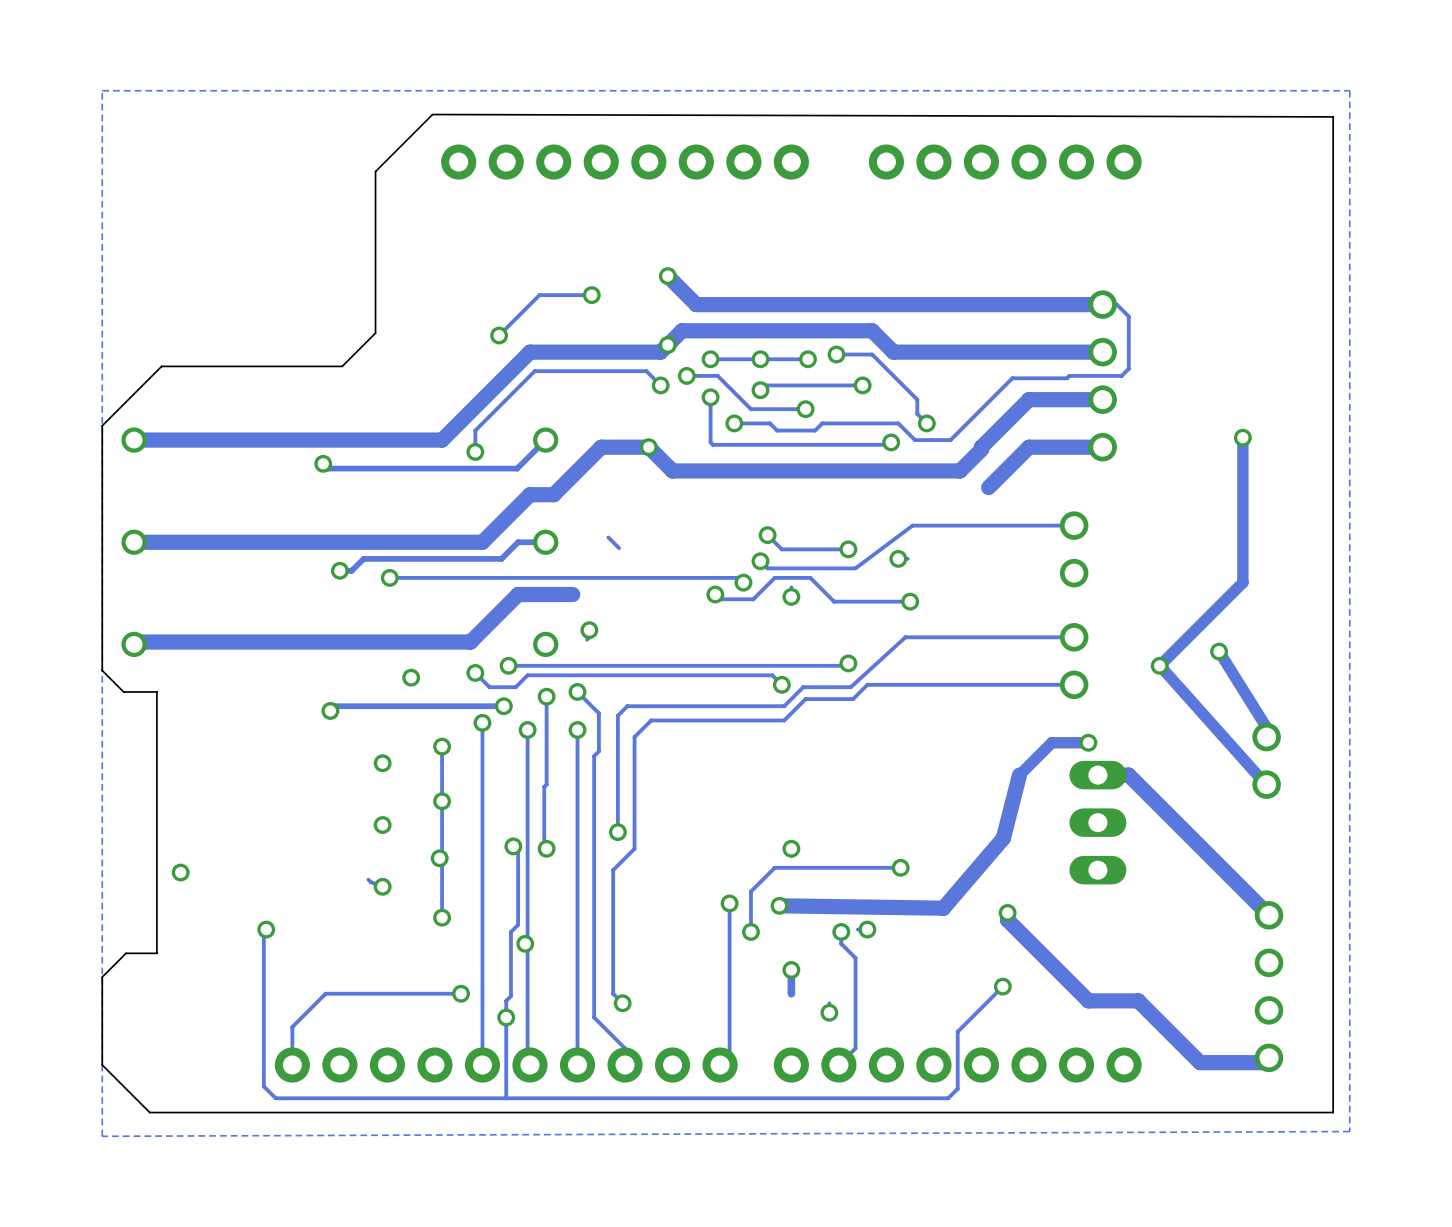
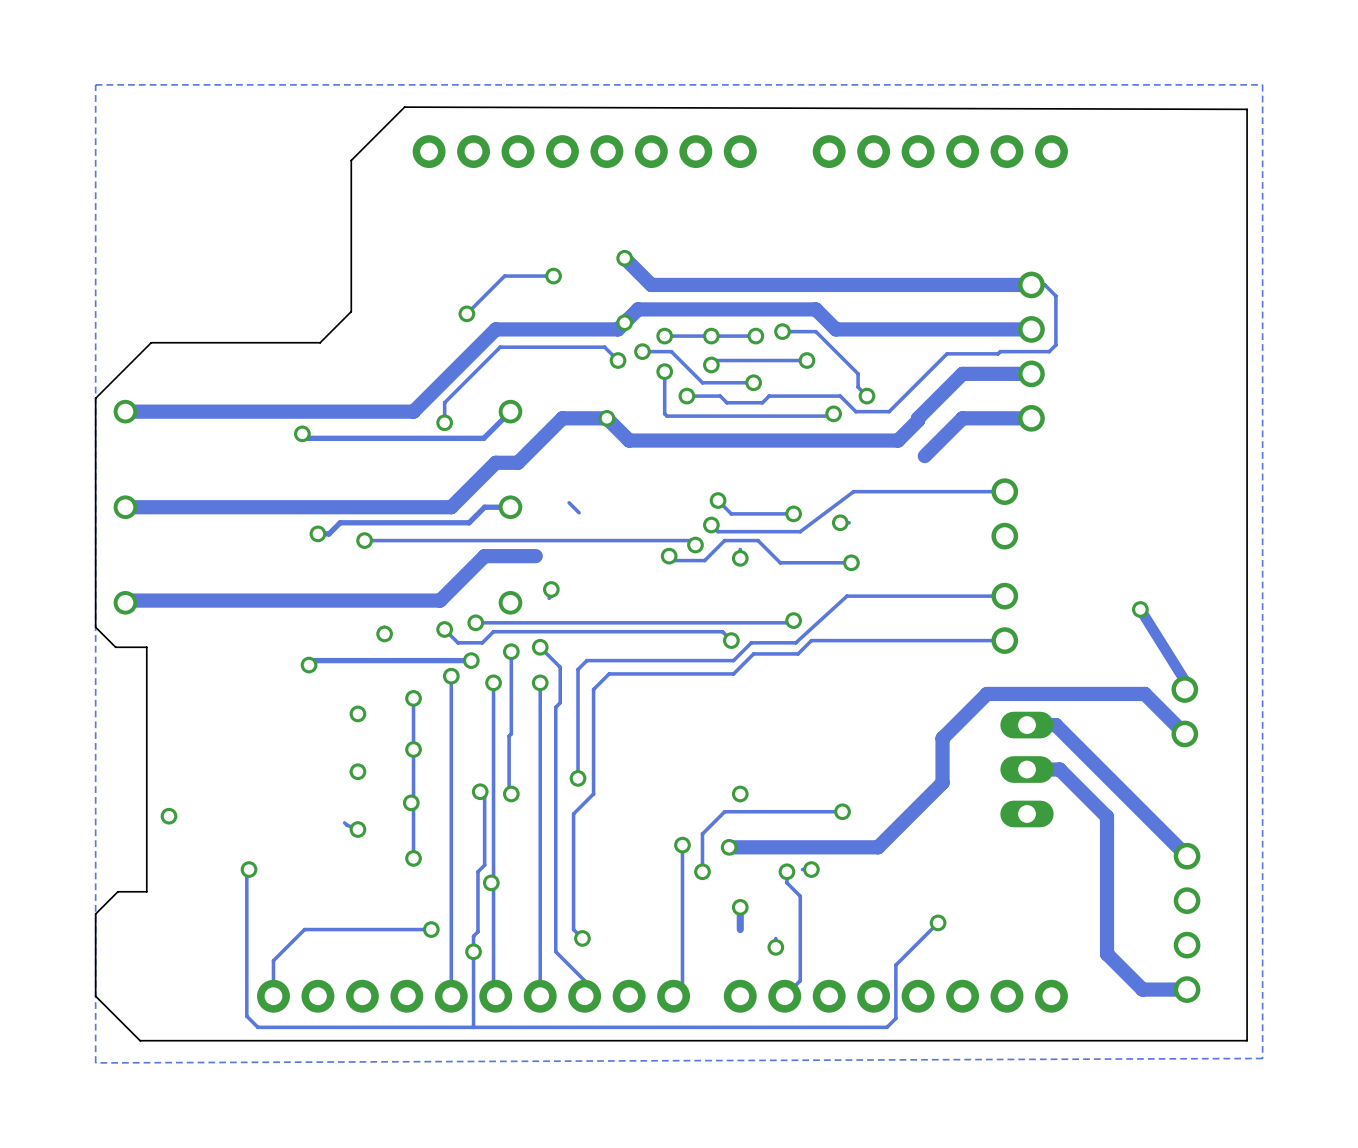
track: (1242, 437) (1242, 582) (1159, 665) -> none
via: (1242, 437) -> none
track: (1162, 662) (1162, 668) (1261, 779) -> none
via: (1159, 665) -> none
track: (1088, 742) (1051, 742) (1019, 775) (1003, 838) (943, 908) (779, 905) -> (1184, 733) (1144, 693) (987, 693) (942, 738) (942, 782) (878, 847) (729, 847)
via: (1088, 742) -> none
track: (1007, 912) (1007, 920) (1088, 1000) (1138, 1000) (1200, 1062) (1264, 1062) (1269, 1057) -> (1027, 769) (1059, 769) (1107, 816) (1107, 954) (1142, 989) (1187, 989)
via: (1007, 912) -> none

